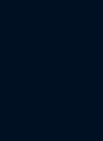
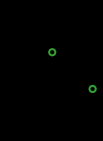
via: none -> (52, 52)
via: none -> (92, 88)

